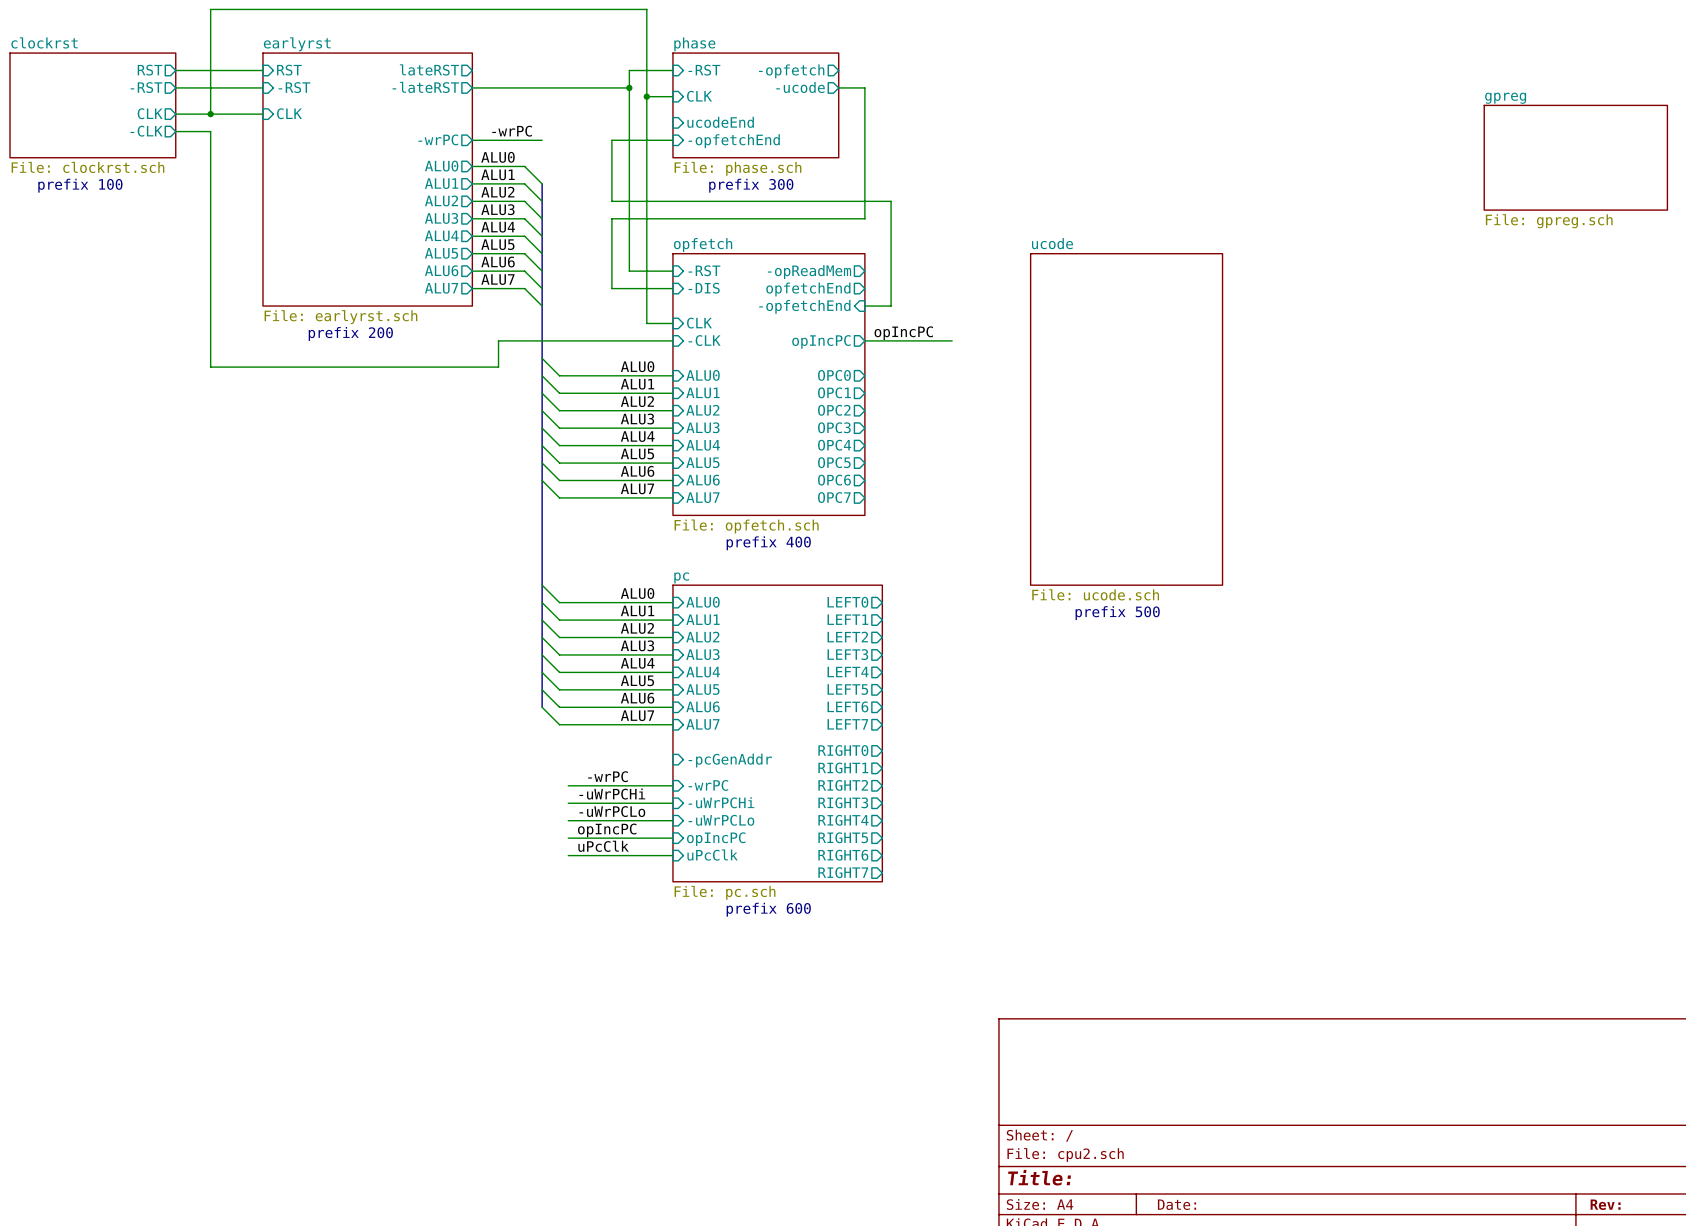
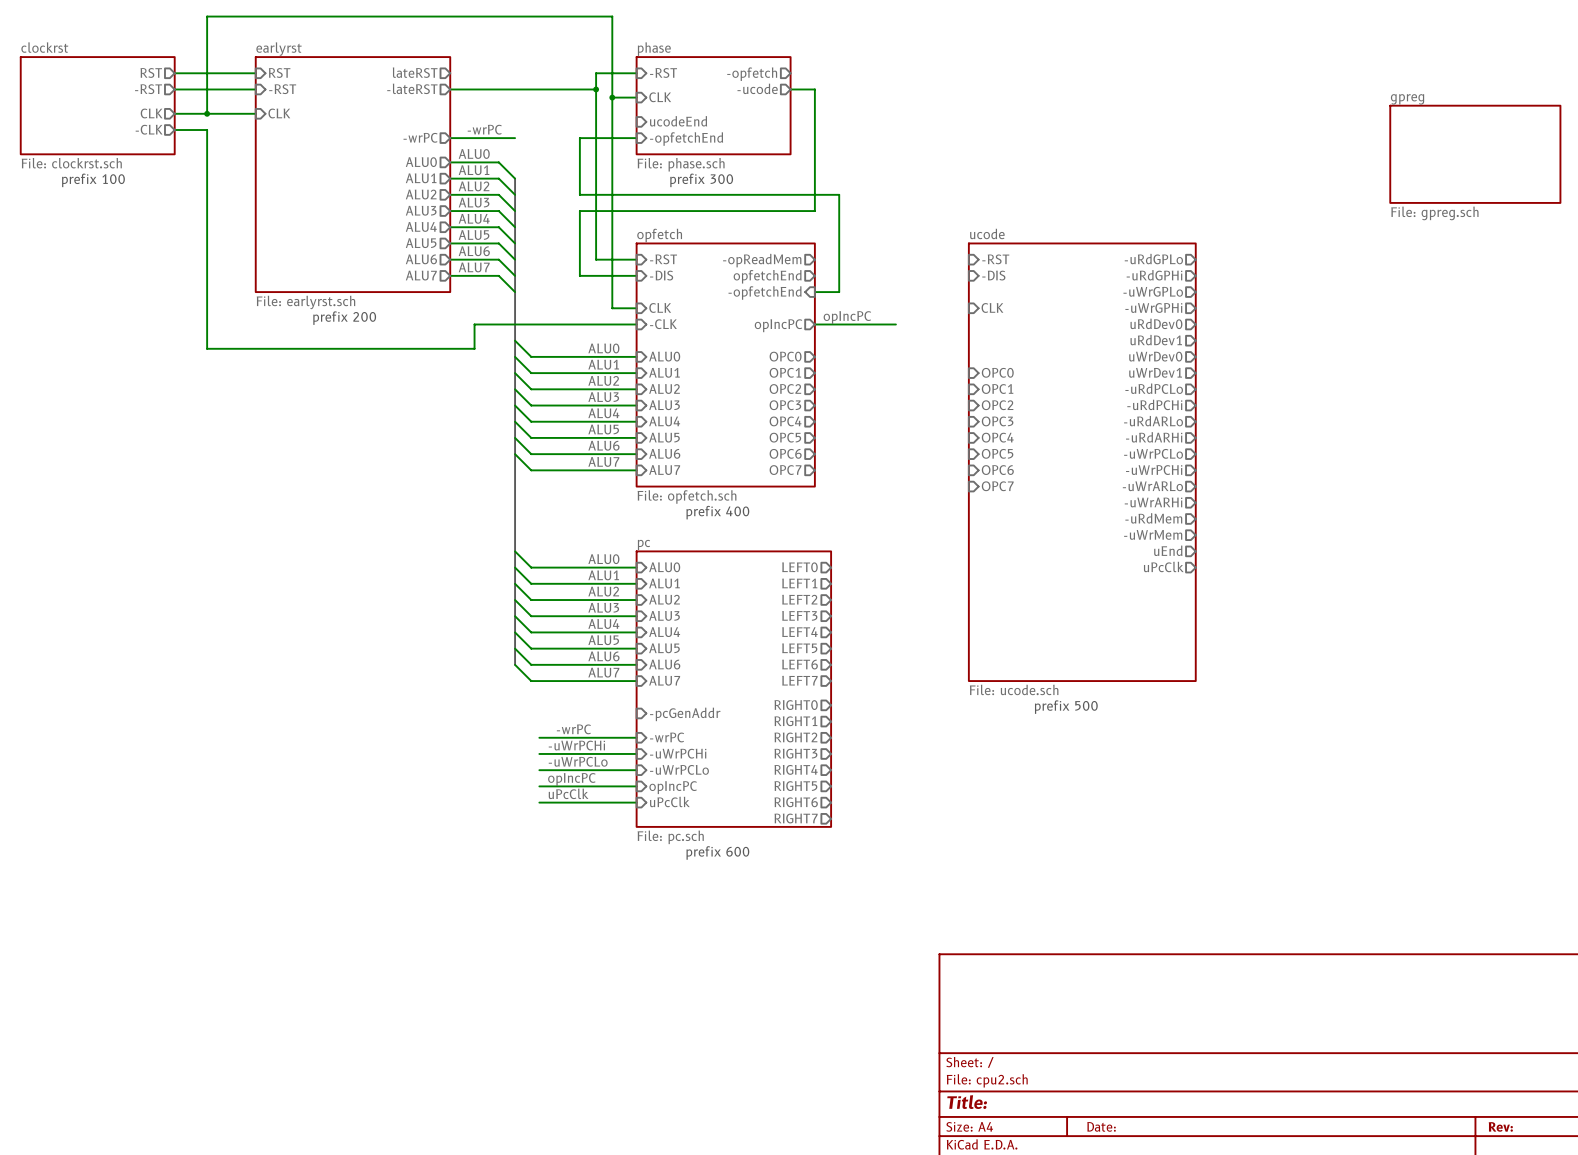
sheet pin: none -> -RST (995, 259)
sheet pin: none -> -uRdGPLo (1153, 259)
sheet pin: none -> -DIS (993, 275)
sheet pin: none -> -uRdGPHi (1154, 275)
sheet pin: none -> -uWrGPLo (1153, 291)
sheet pin: none -> -uWrGPHi (1153, 307)
sheet pin: none -> CLK (992, 307)
sheet pin: none -> uRdDev0 (1156, 323)
sheet pin: none -> uRdDev1 (1156, 340)
sheet pin: none -> uWrDev0 (1155, 356)
sheet pin: none -> OPC0 (997, 372)
sheet pin: none -> uWrDev1 (1155, 372)
sheet pin: none -> OPC1 (997, 389)
sheet pin: none -> -uRdPCLo (1154, 388)
sheet ucode: File: ucode.sch (1126, 419) -> none
sheet pin: none -> OPC2 (997, 405)
sheet pin: none -> -uRdPCHi (1154, 404)
sheet pin: none -> OPC3 (997, 421)
sheet pin: none -> -uRdARLo (1153, 421)
sheet pin: none -> OPC4 (997, 437)
sheet pin: none -> -uRdARHi (1154, 437)
sheet pin: none -> OPC5 (997, 453)
sheet pin: none -> -uWrPCLo (1153, 453)
sheet ucode: none -> File: ucode.sch (1082, 462)
sheet pin: none -> OPC6 (997, 470)
sheet pin: none -> -uWrPCHi (1154, 470)
sheet pin: none -> OPC7 (997, 486)
sheet pin: none -> -uWrARLo (1152, 486)
sheet pin: none -> -uWrARHi (1153, 502)
sheet pin: none -> -uRdMem (1153, 518)
sheet pin: none -> -uWrMem (1153, 534)
sheet pin: none -> uEnd (1168, 550)
sheet pin: none -> uPcClk (1163, 566)
text position: prefix 500 (1117, 613) -> prefix 500 (1066, 707)

